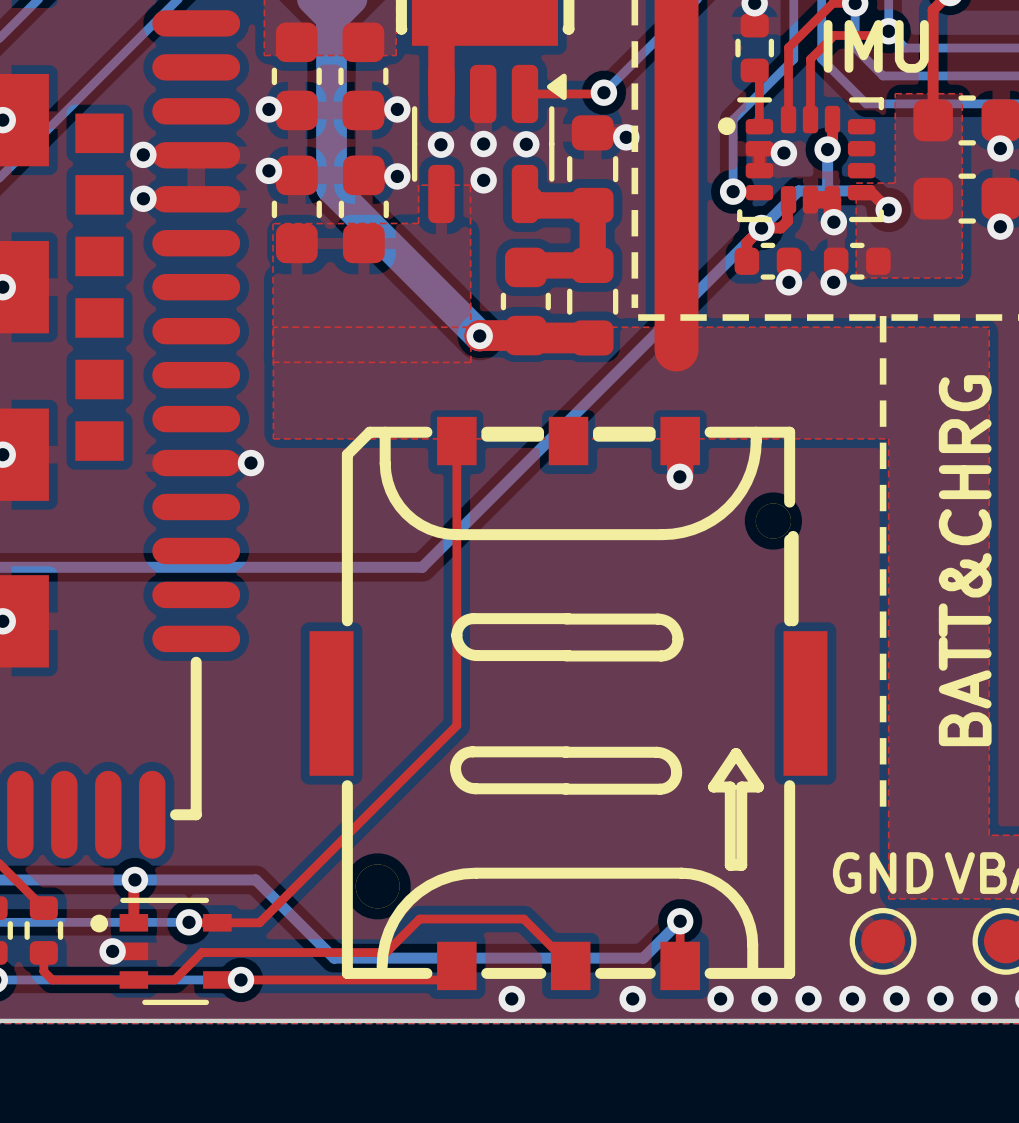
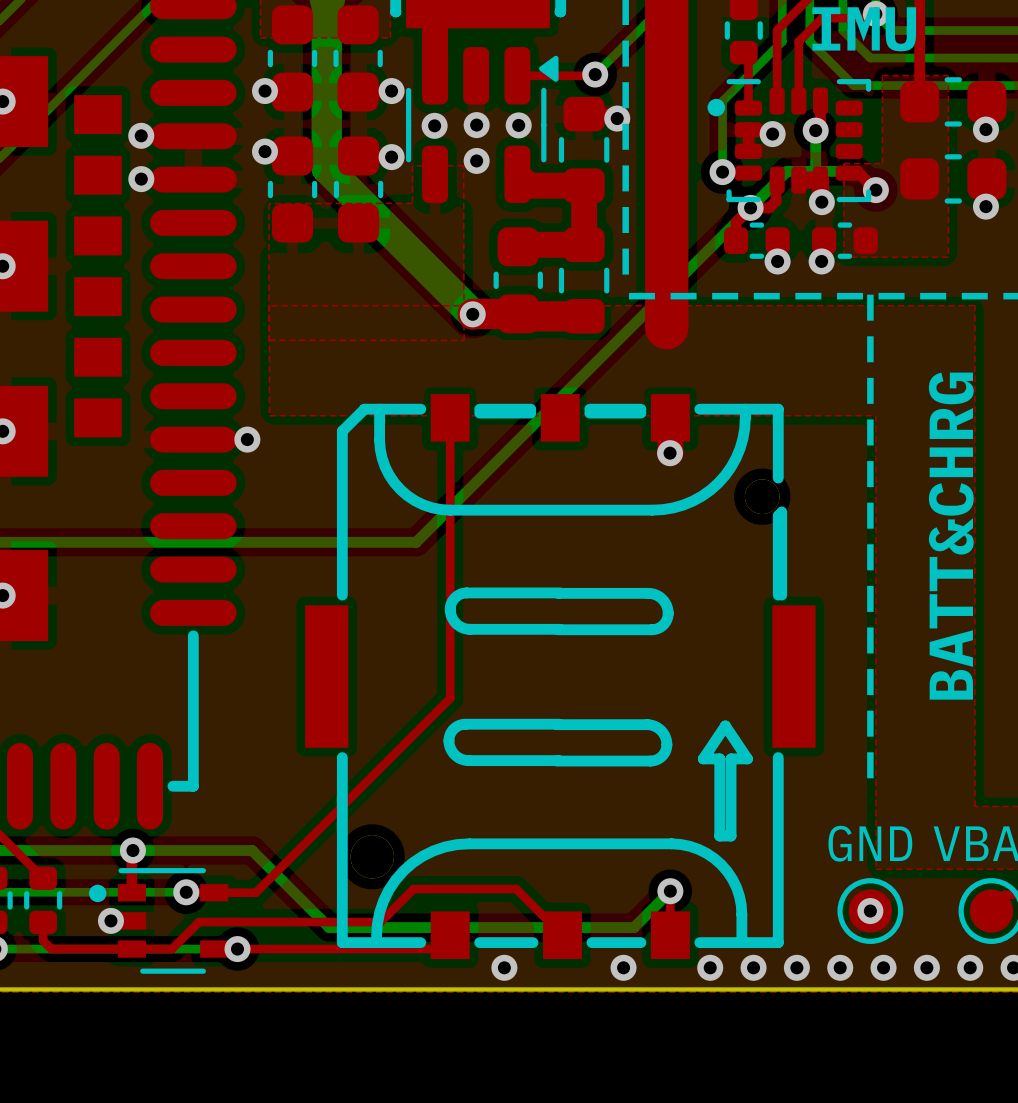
via: none -> (870, 911)

